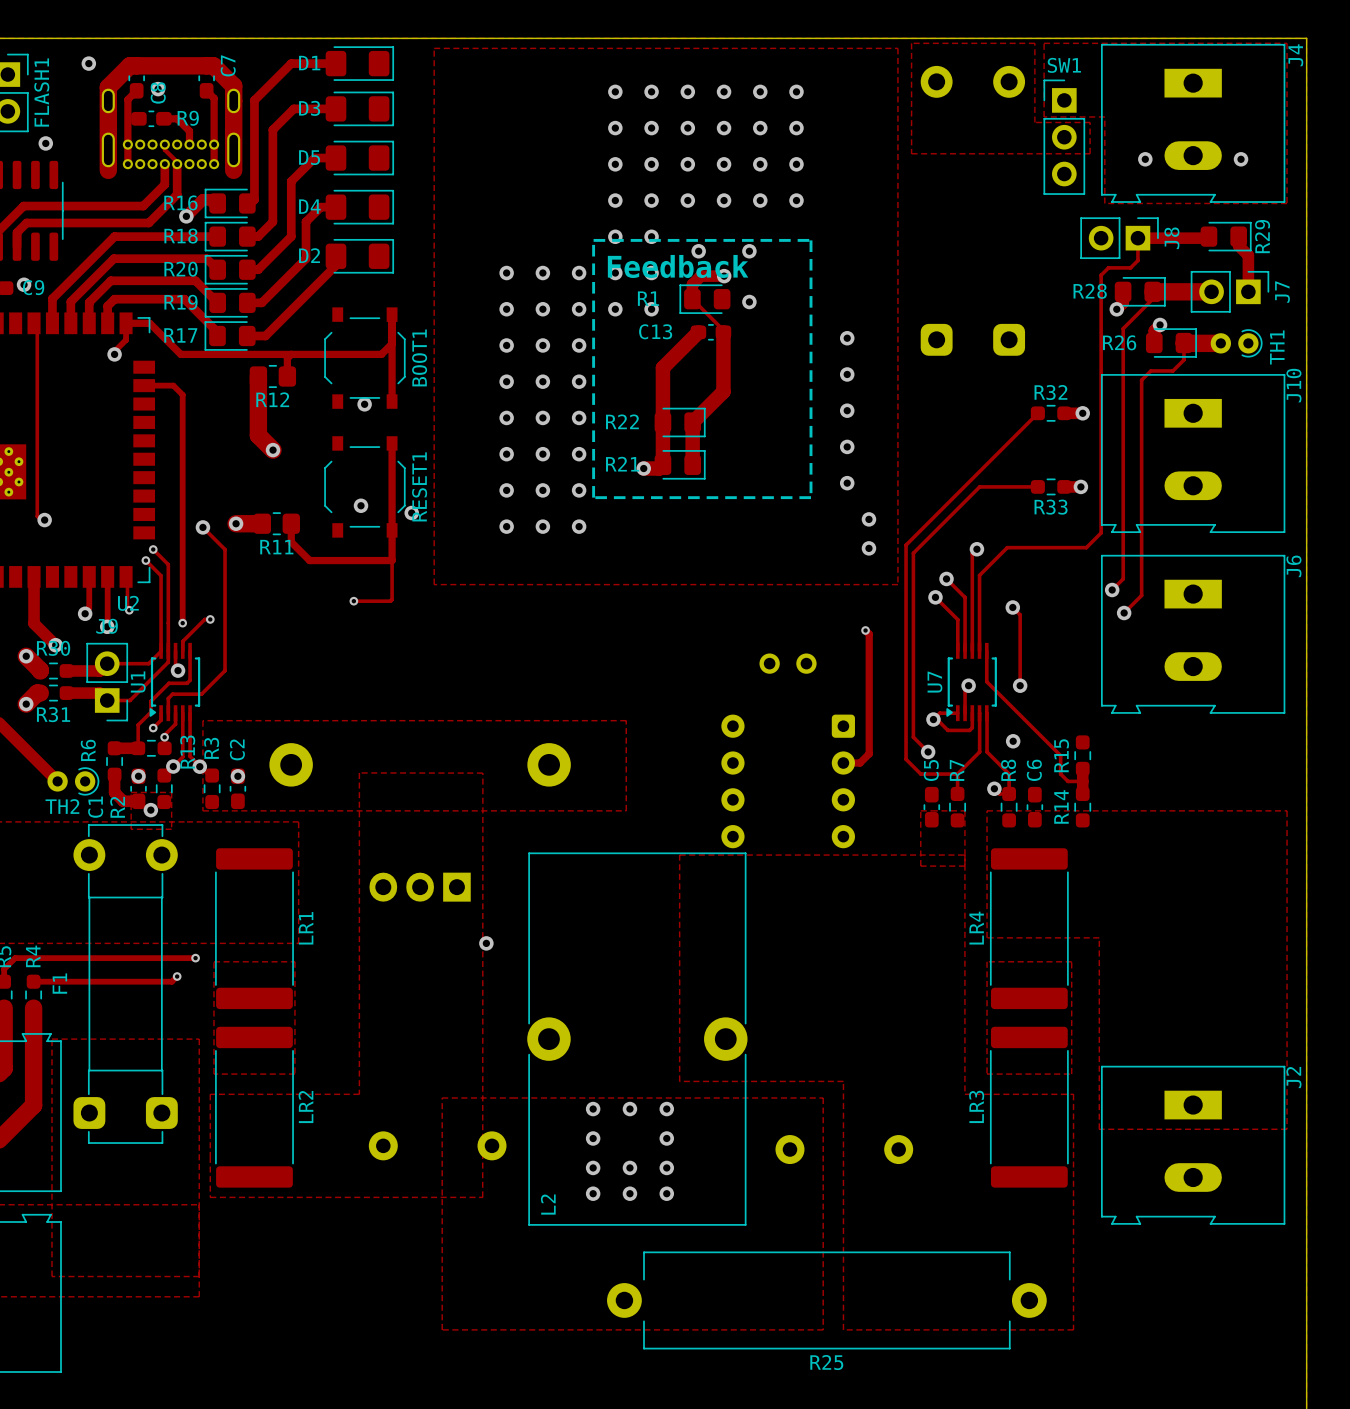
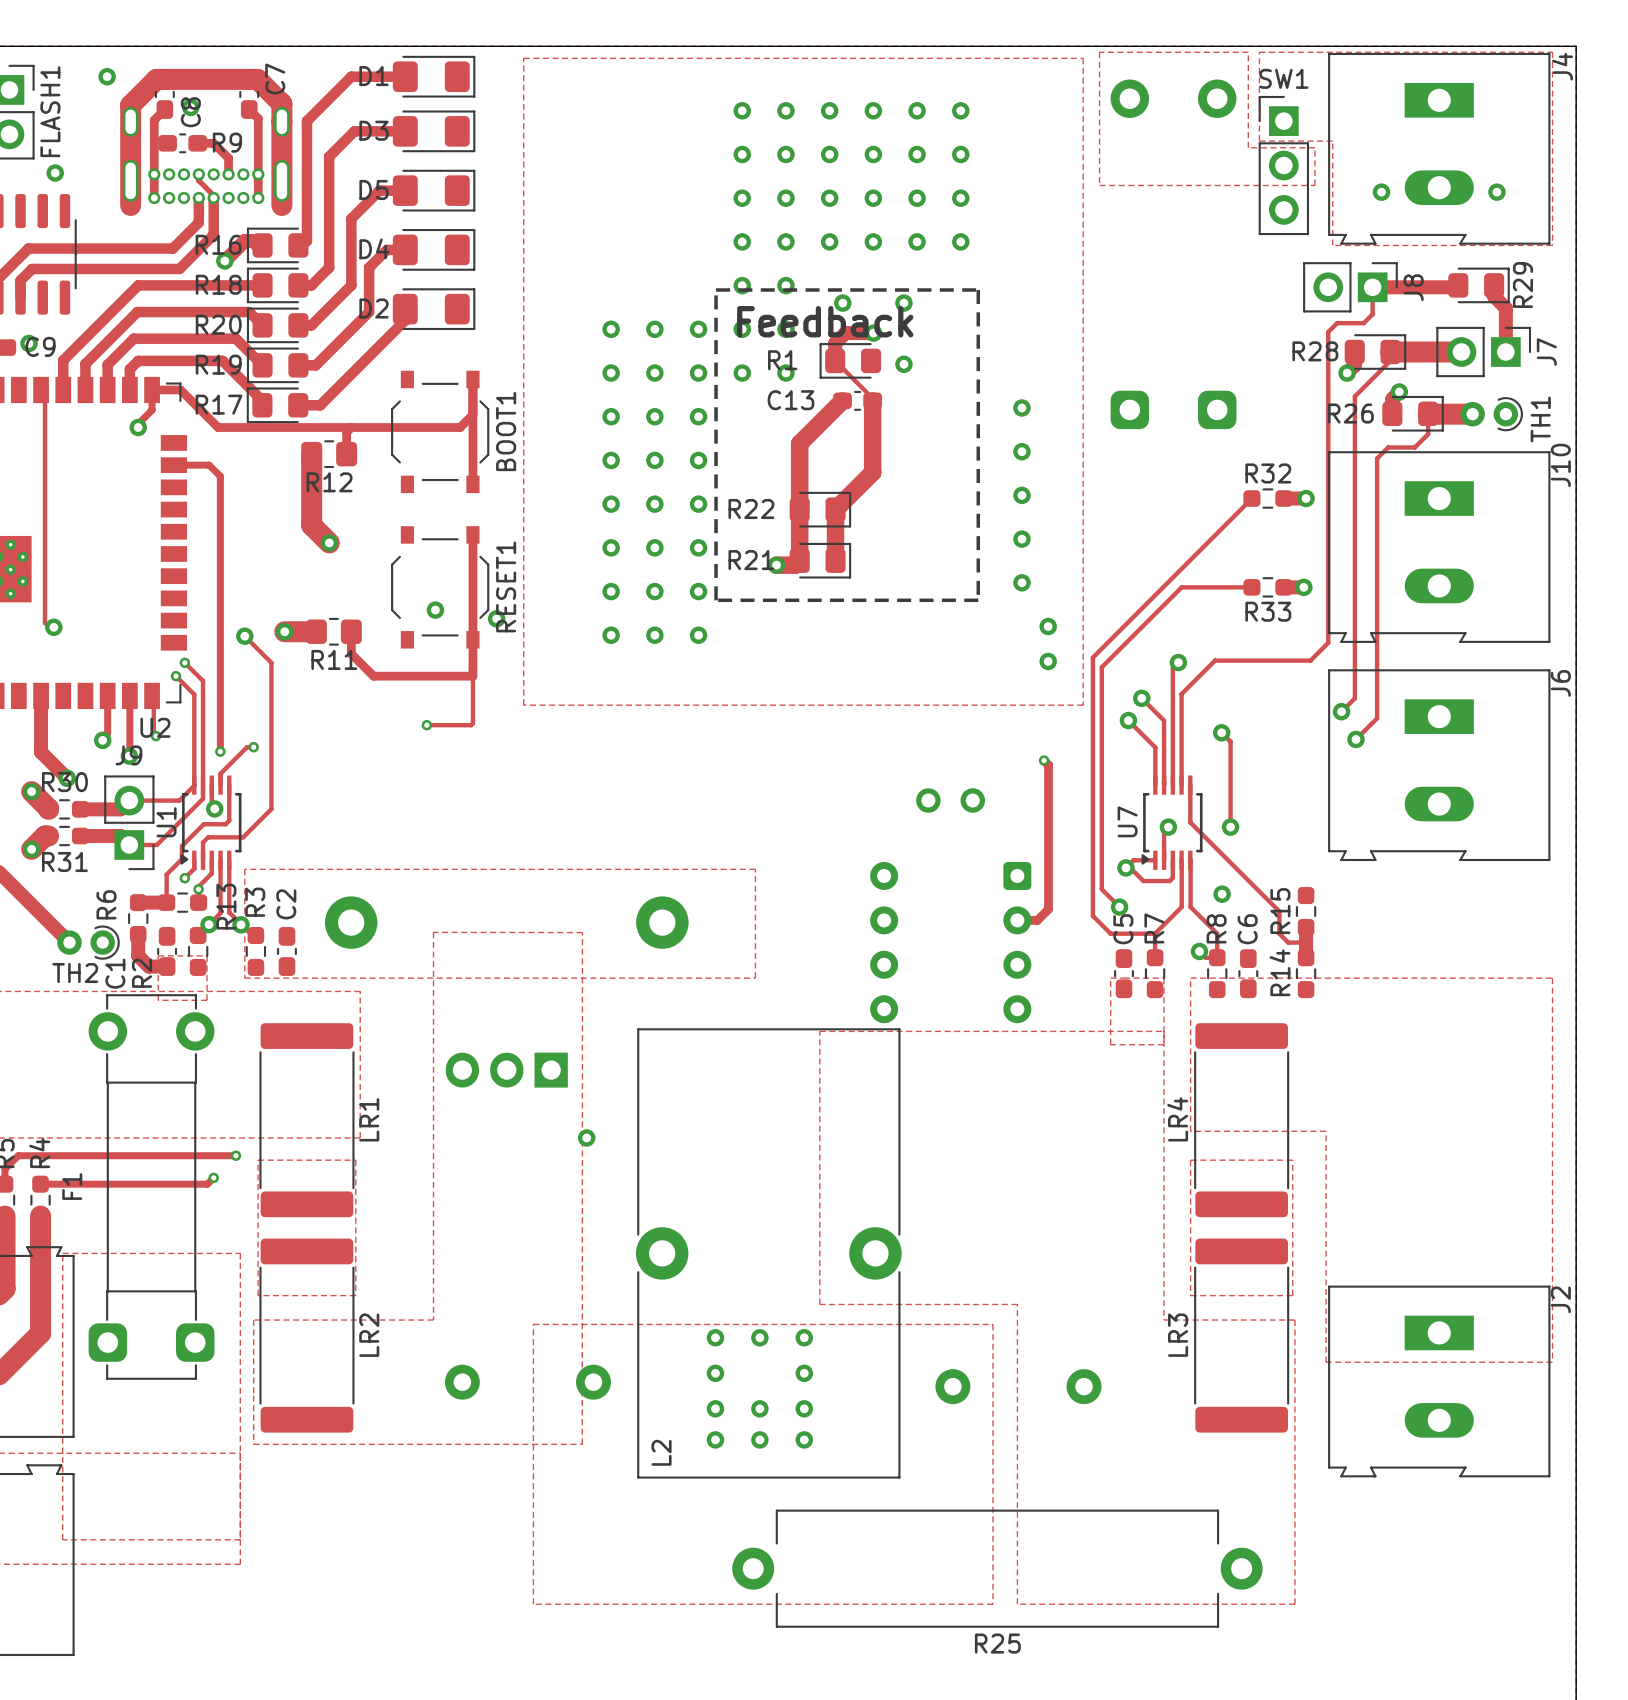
via: (364, 404) -> none
via: (138, 776) -> none
via: (237, 776) -> none
via: (150, 810) -> none

